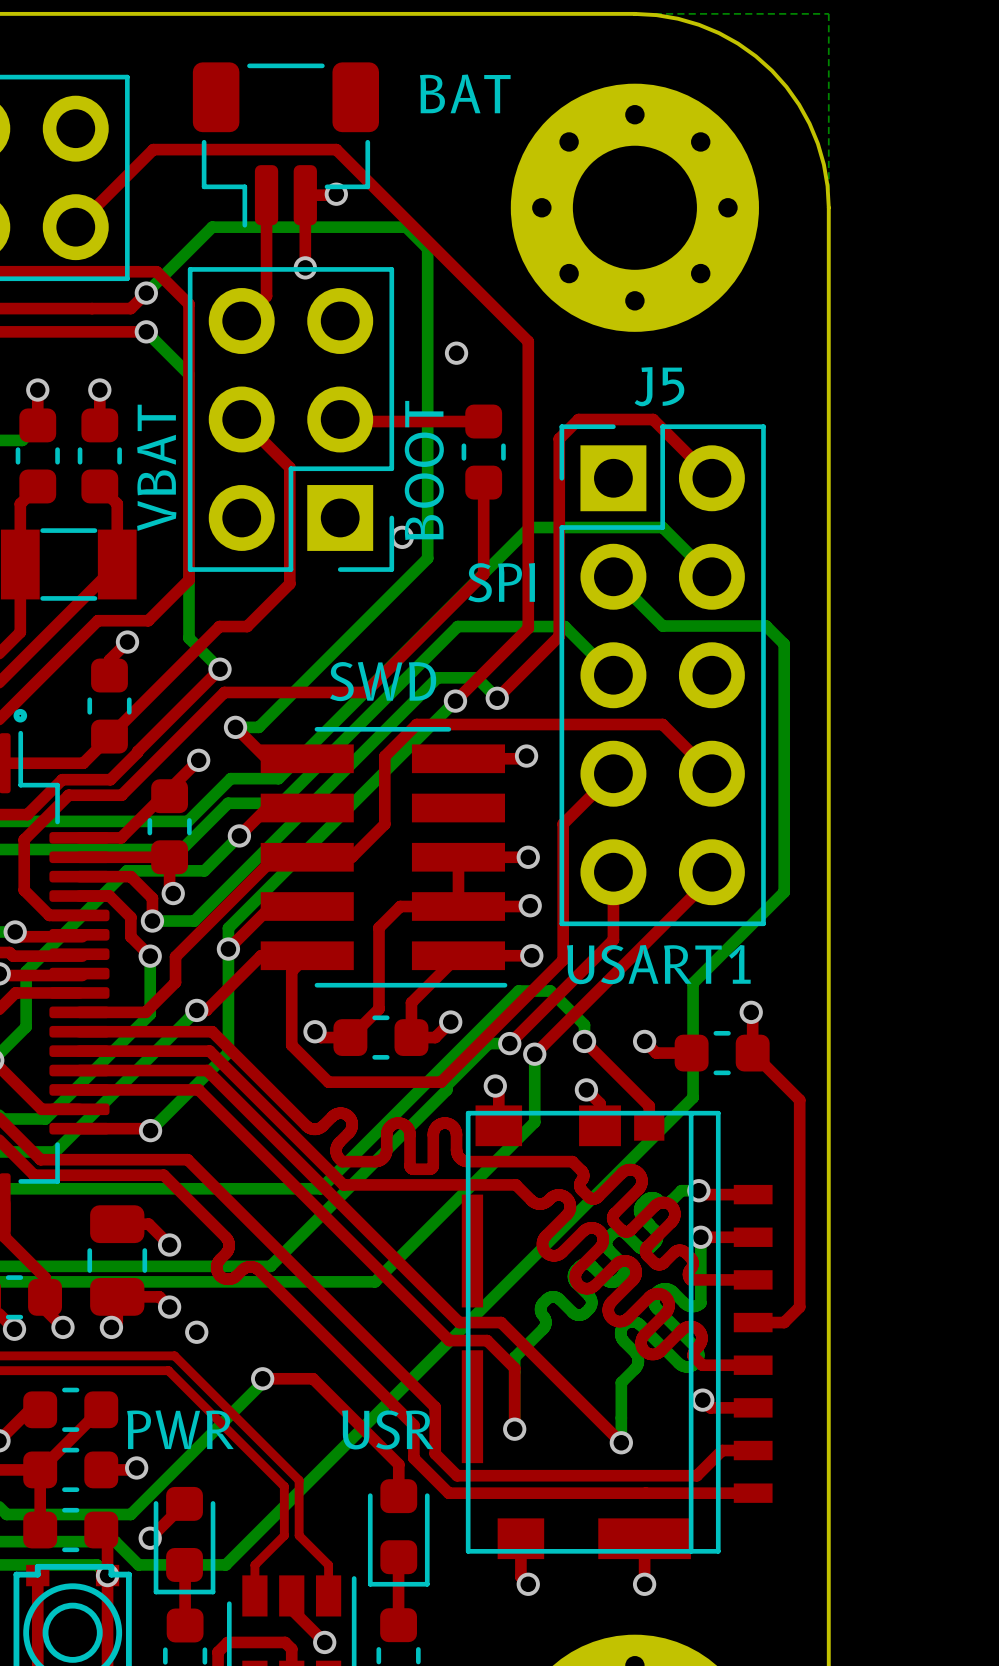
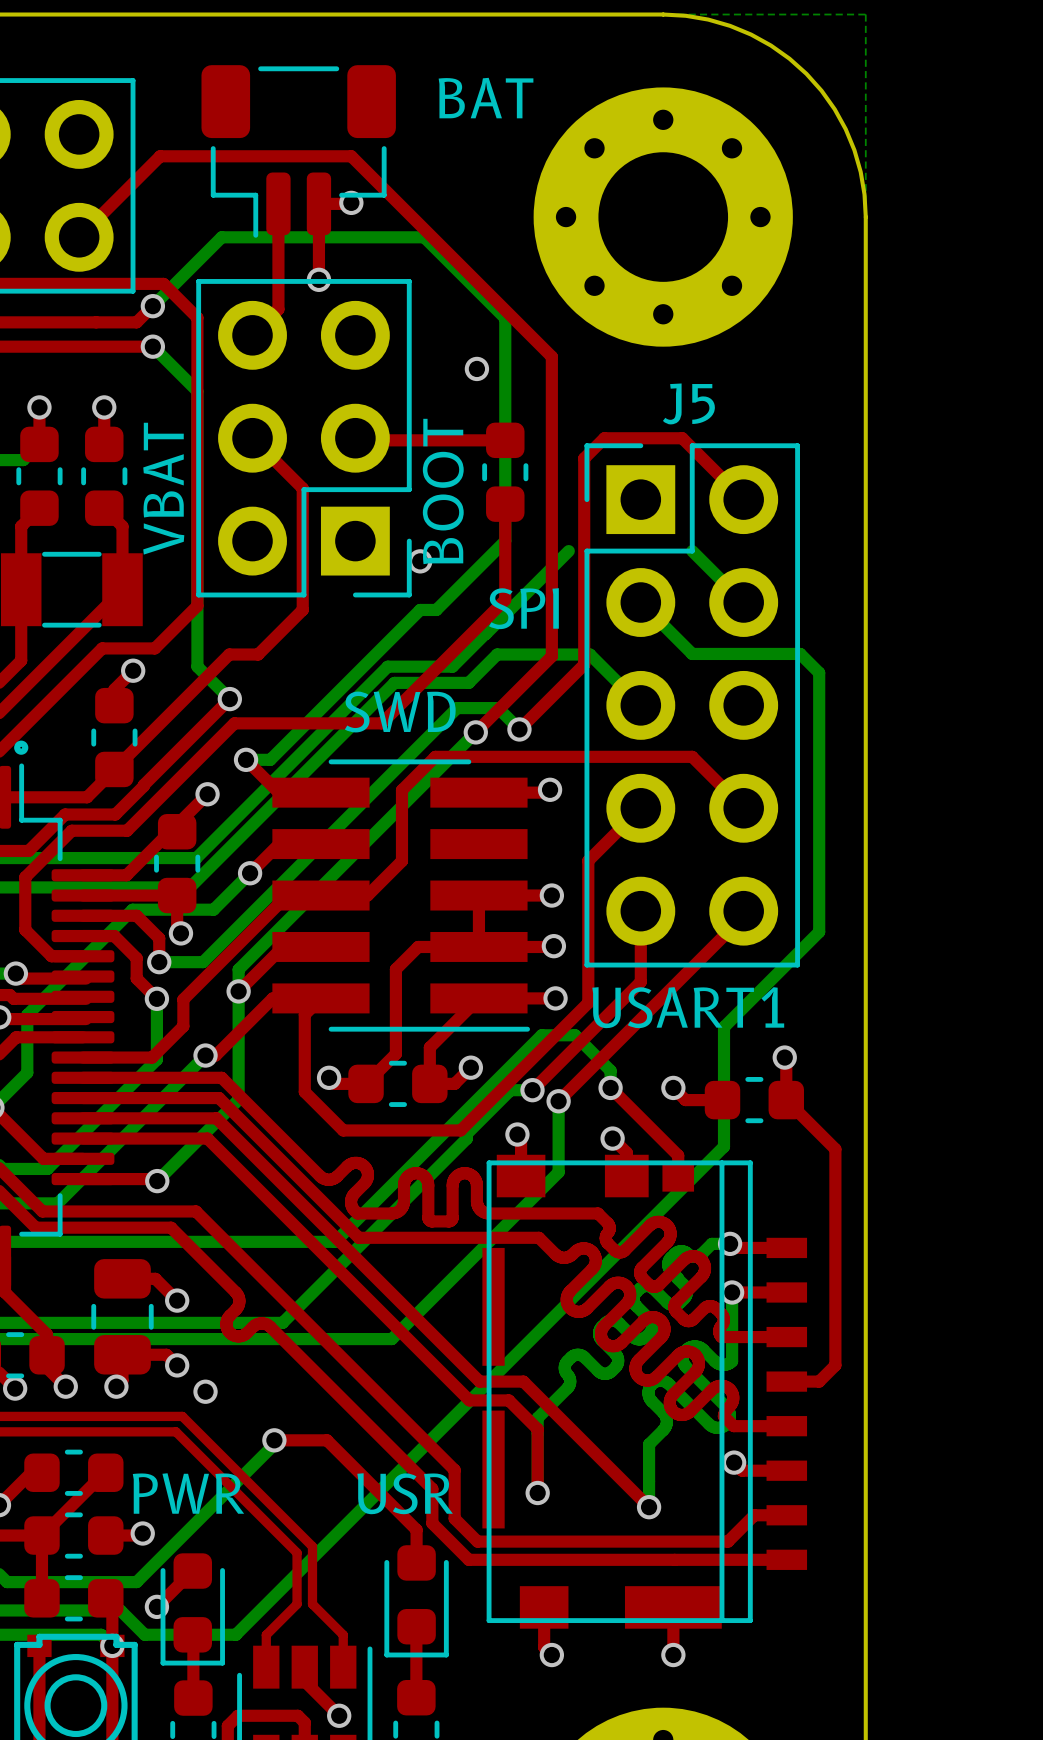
bottom track: (427, 248) (427, 558) (402, 583) -> (446, 259) (505, 318) (505, 541) (436, 609) (420, 609)
bottom track: none -> (568, 551) (485, 634)
bottom track: (662, 527) (529, 527) (278, 778) (230, 778) -> (485, 634) (452, 666) (387, 666) (241, 813)
bottom track: (475, 626) (457, 626) (281, 803) (228, 803) -> (497, 654) (468, 682) (394, 682) (238, 839)

